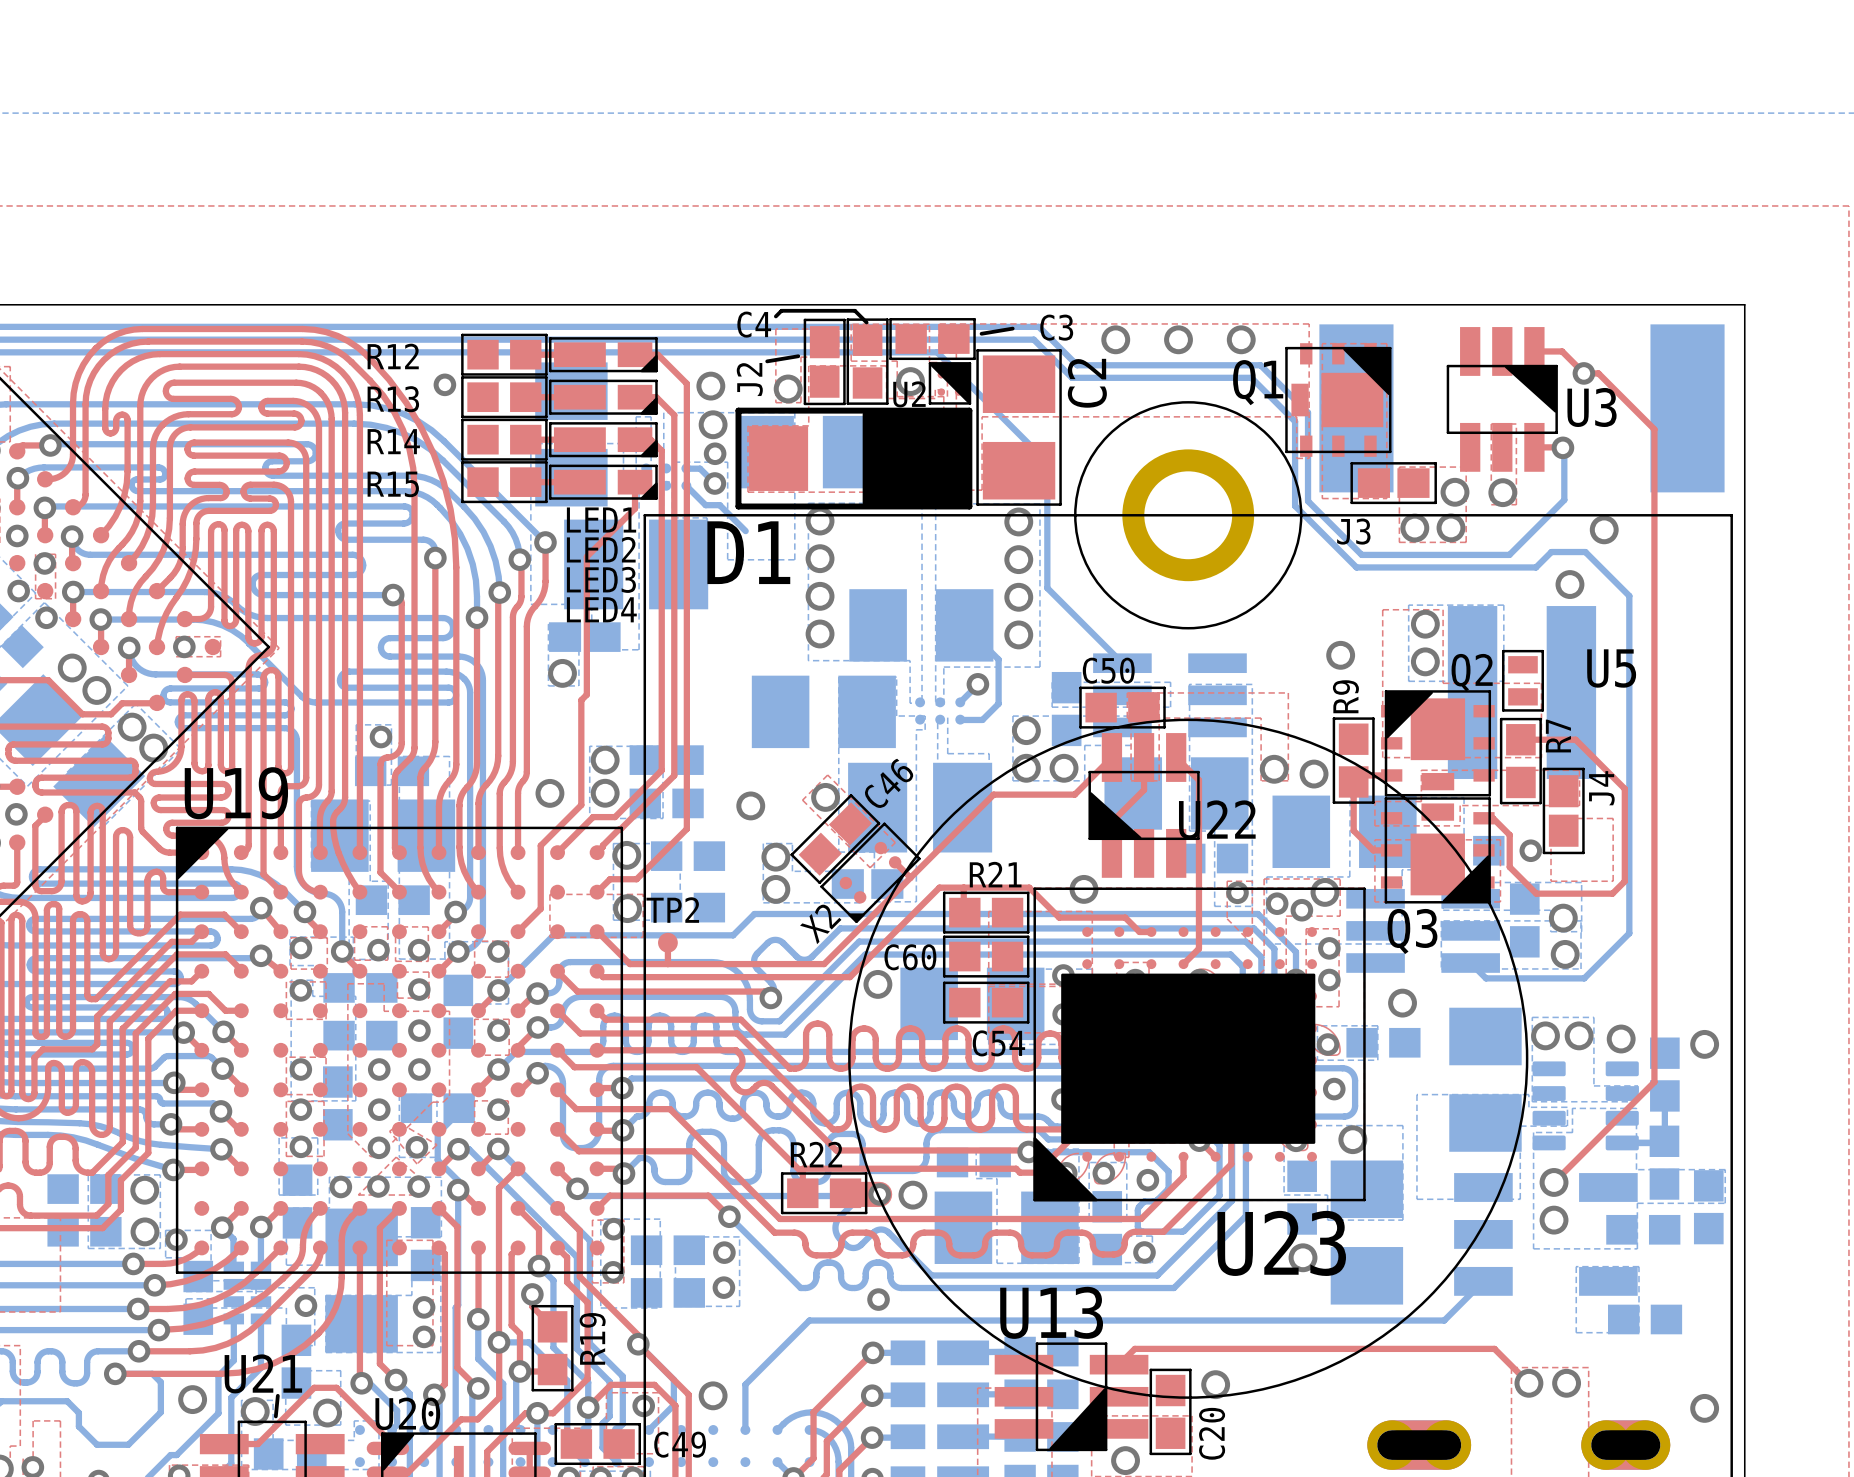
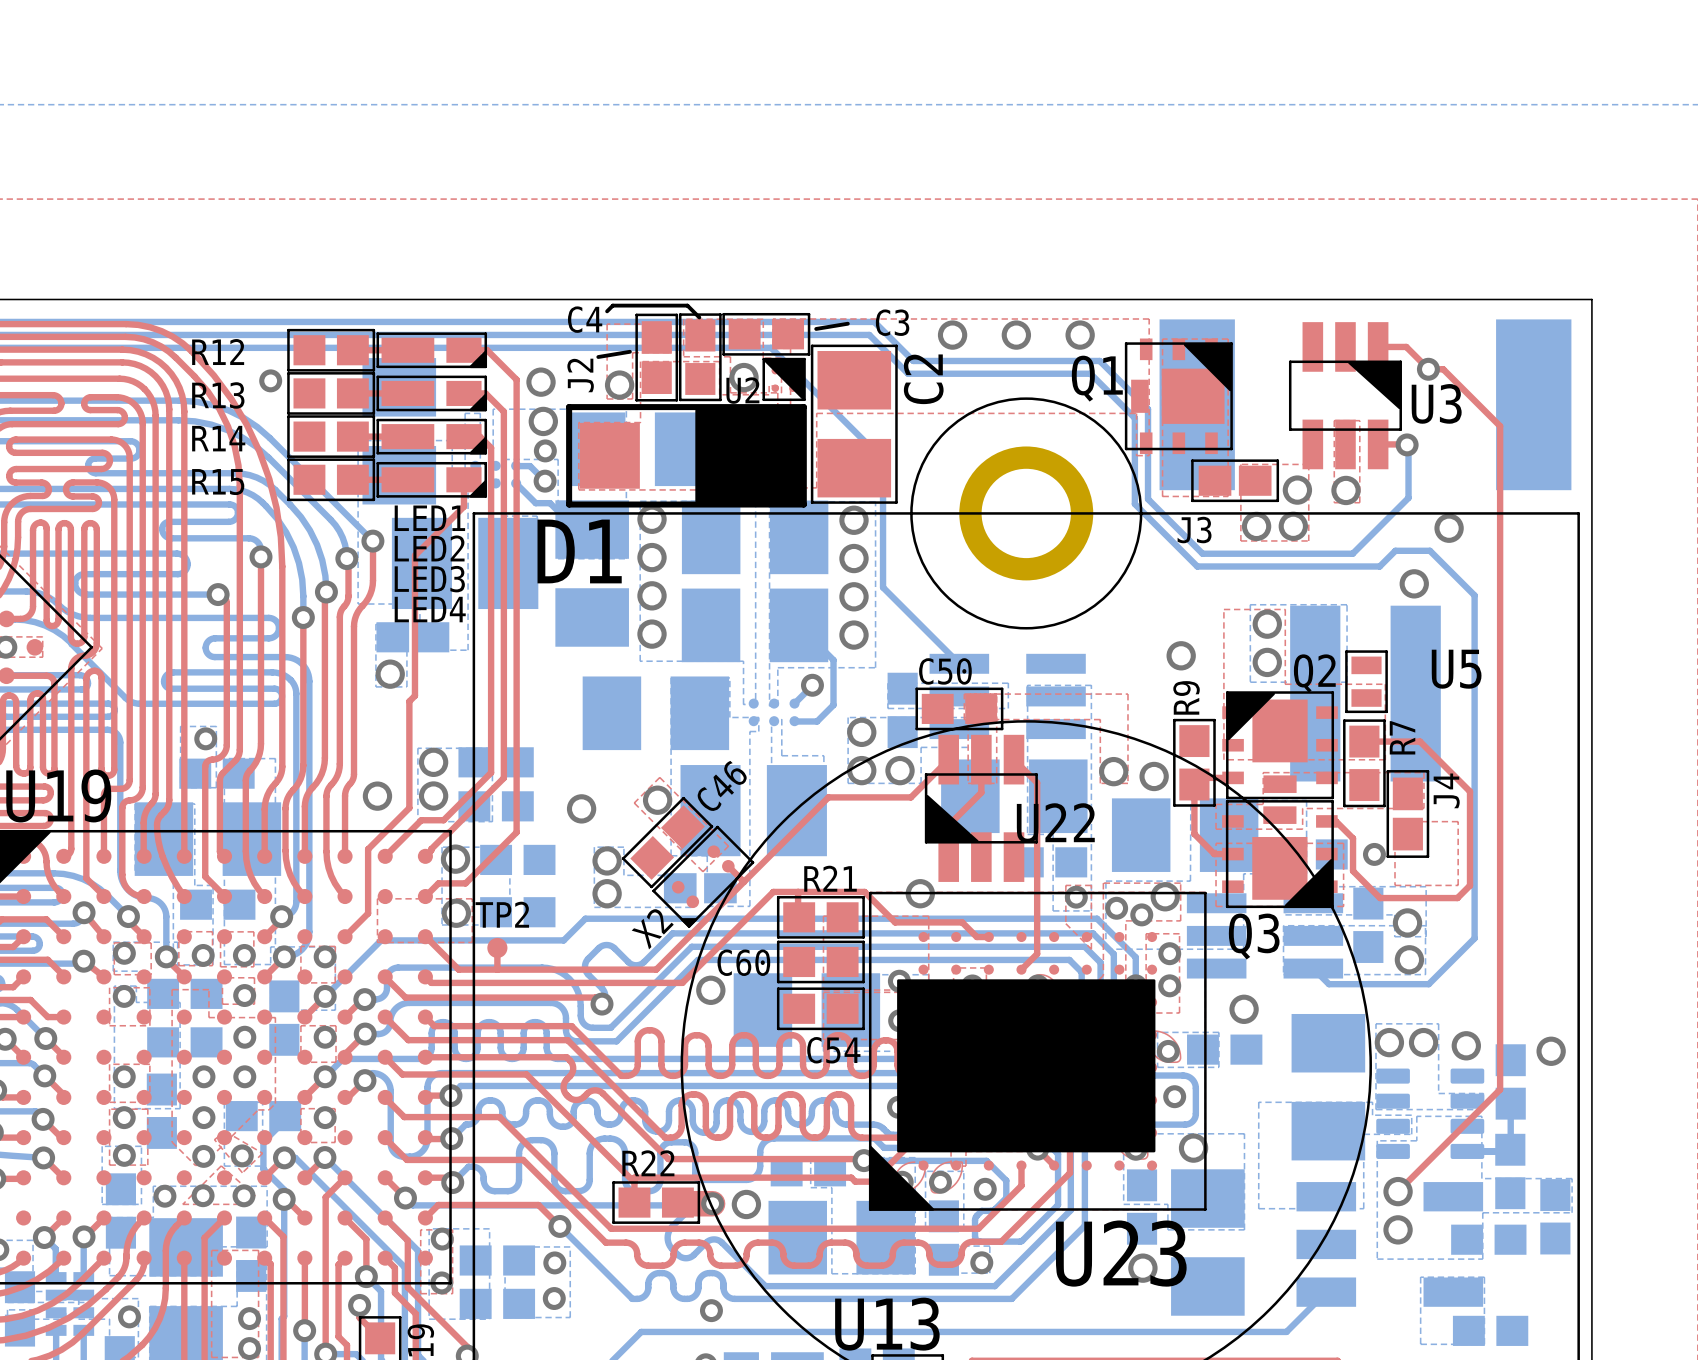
part: none -> (755, 537)
part: none -> (592, 573)

